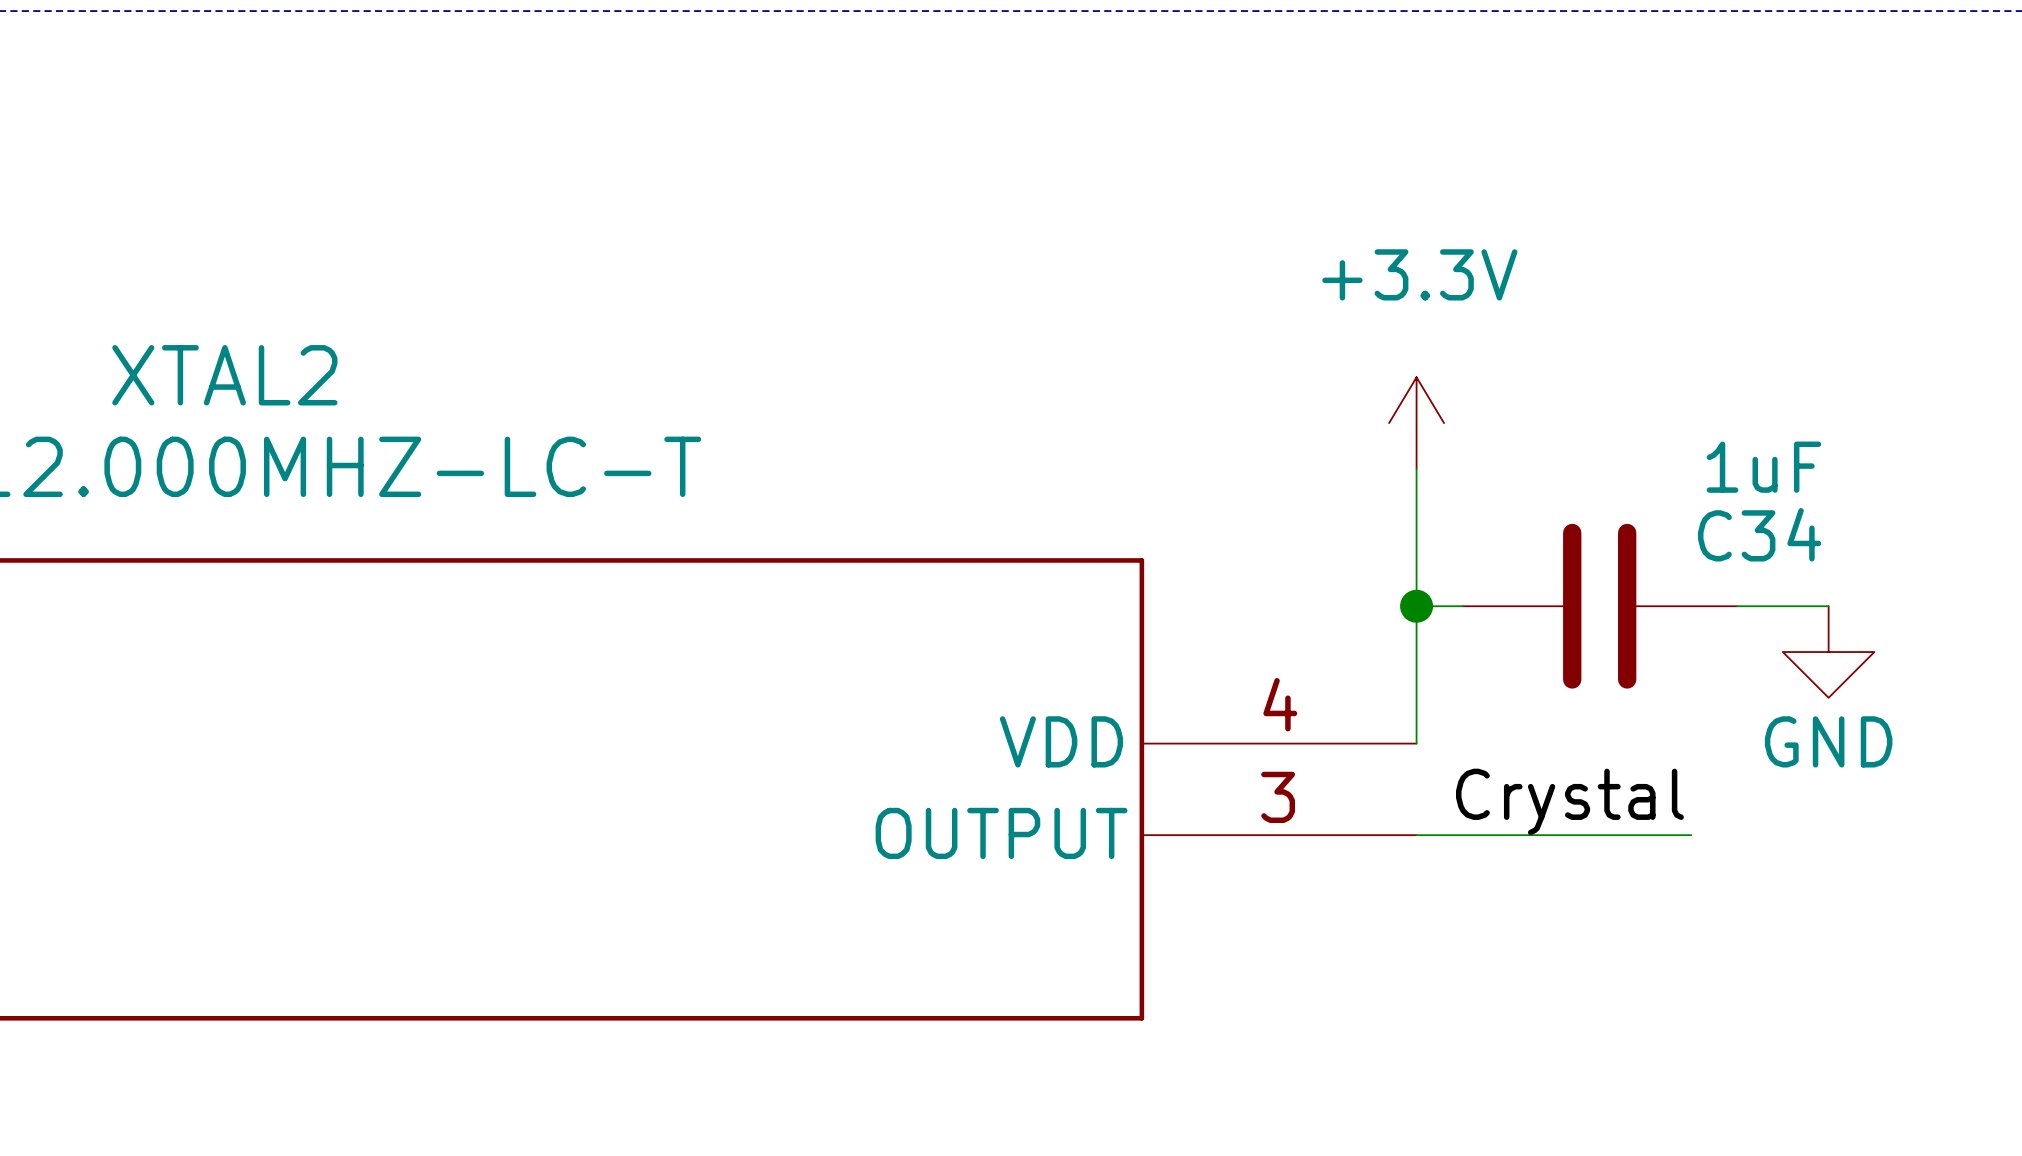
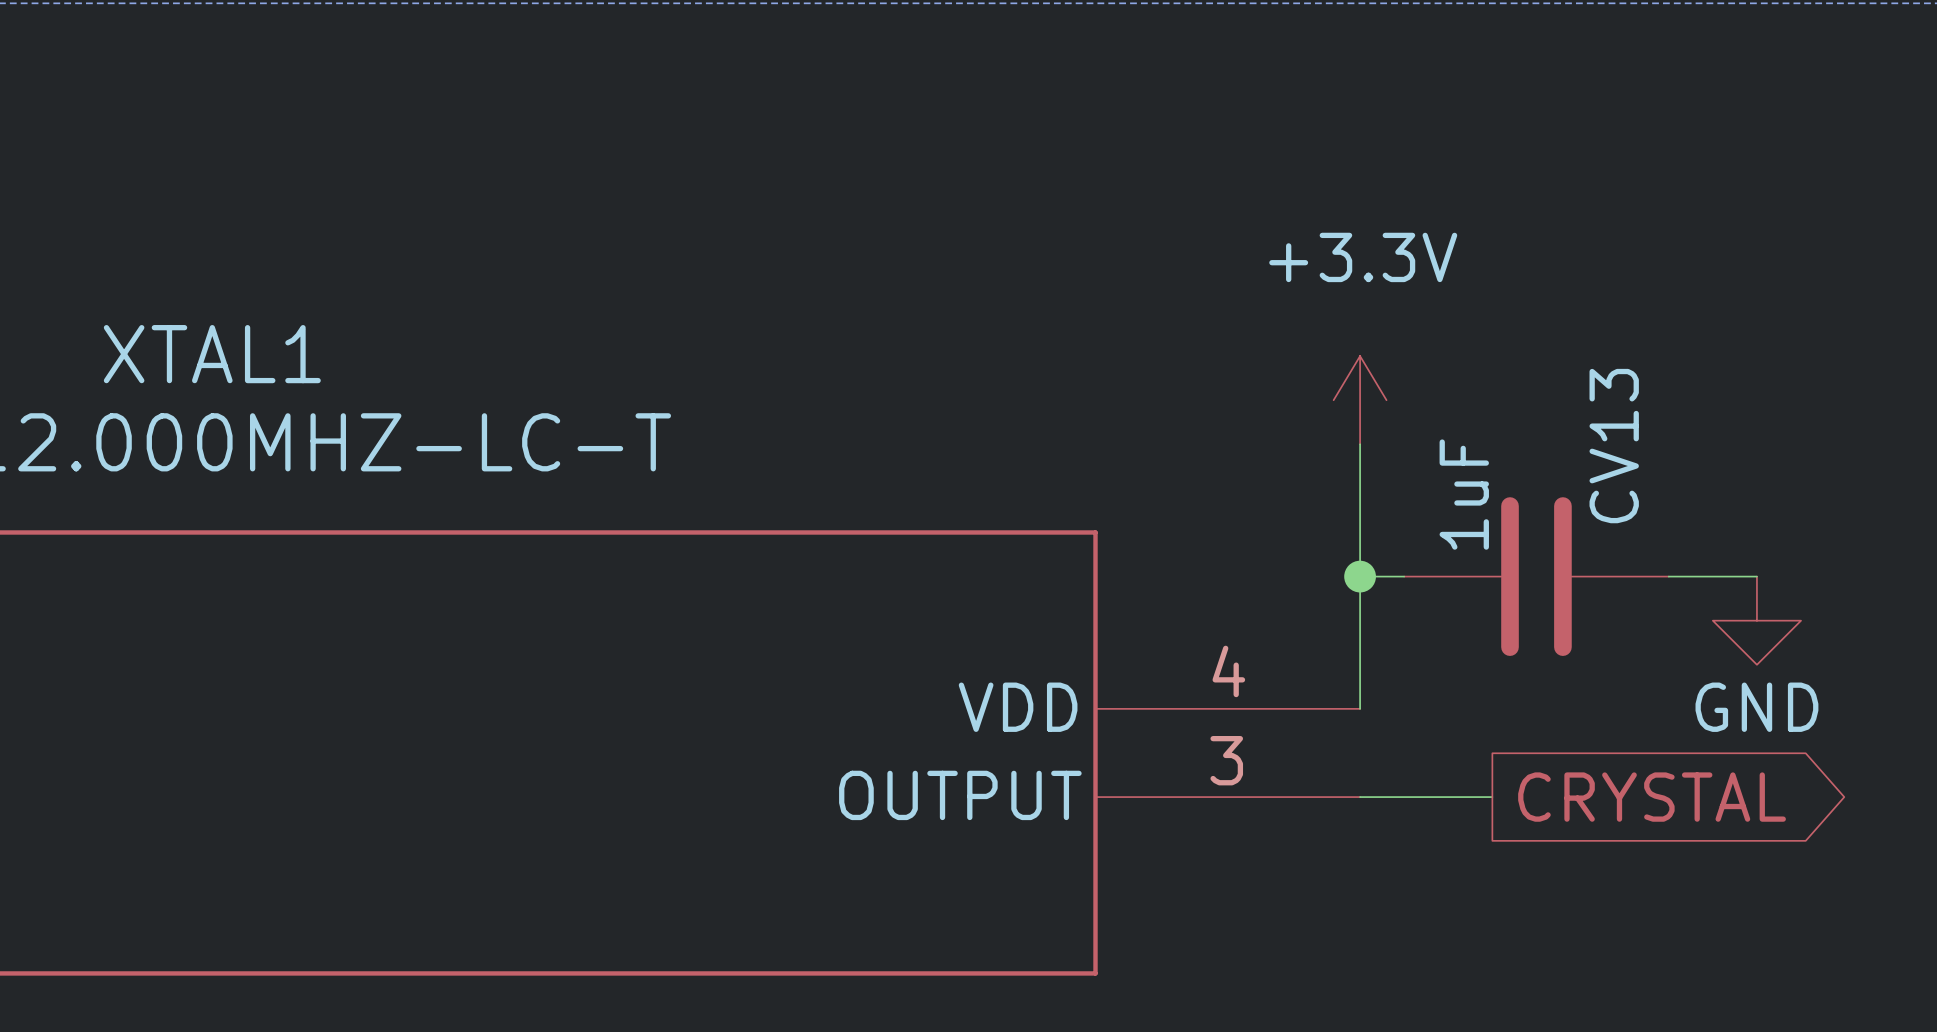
XTAL2 name: XTAL2 (224, 375) -> XTAL1 (212, 354)
C34 value rotation: 0° (1763, 467) -> 90° counterclockwise (1464, 494)
C34 value position: 1uF (1763, 467) -> 1uF (1464, 494)
C34 name: C34 (1759, 534) -> CV13 (1614, 446)
label: Crystal (1569, 801) -> none
wire: (1553, 835) (1691, 835) -> none
global label: none -> CRYSTAL (1652, 797)

